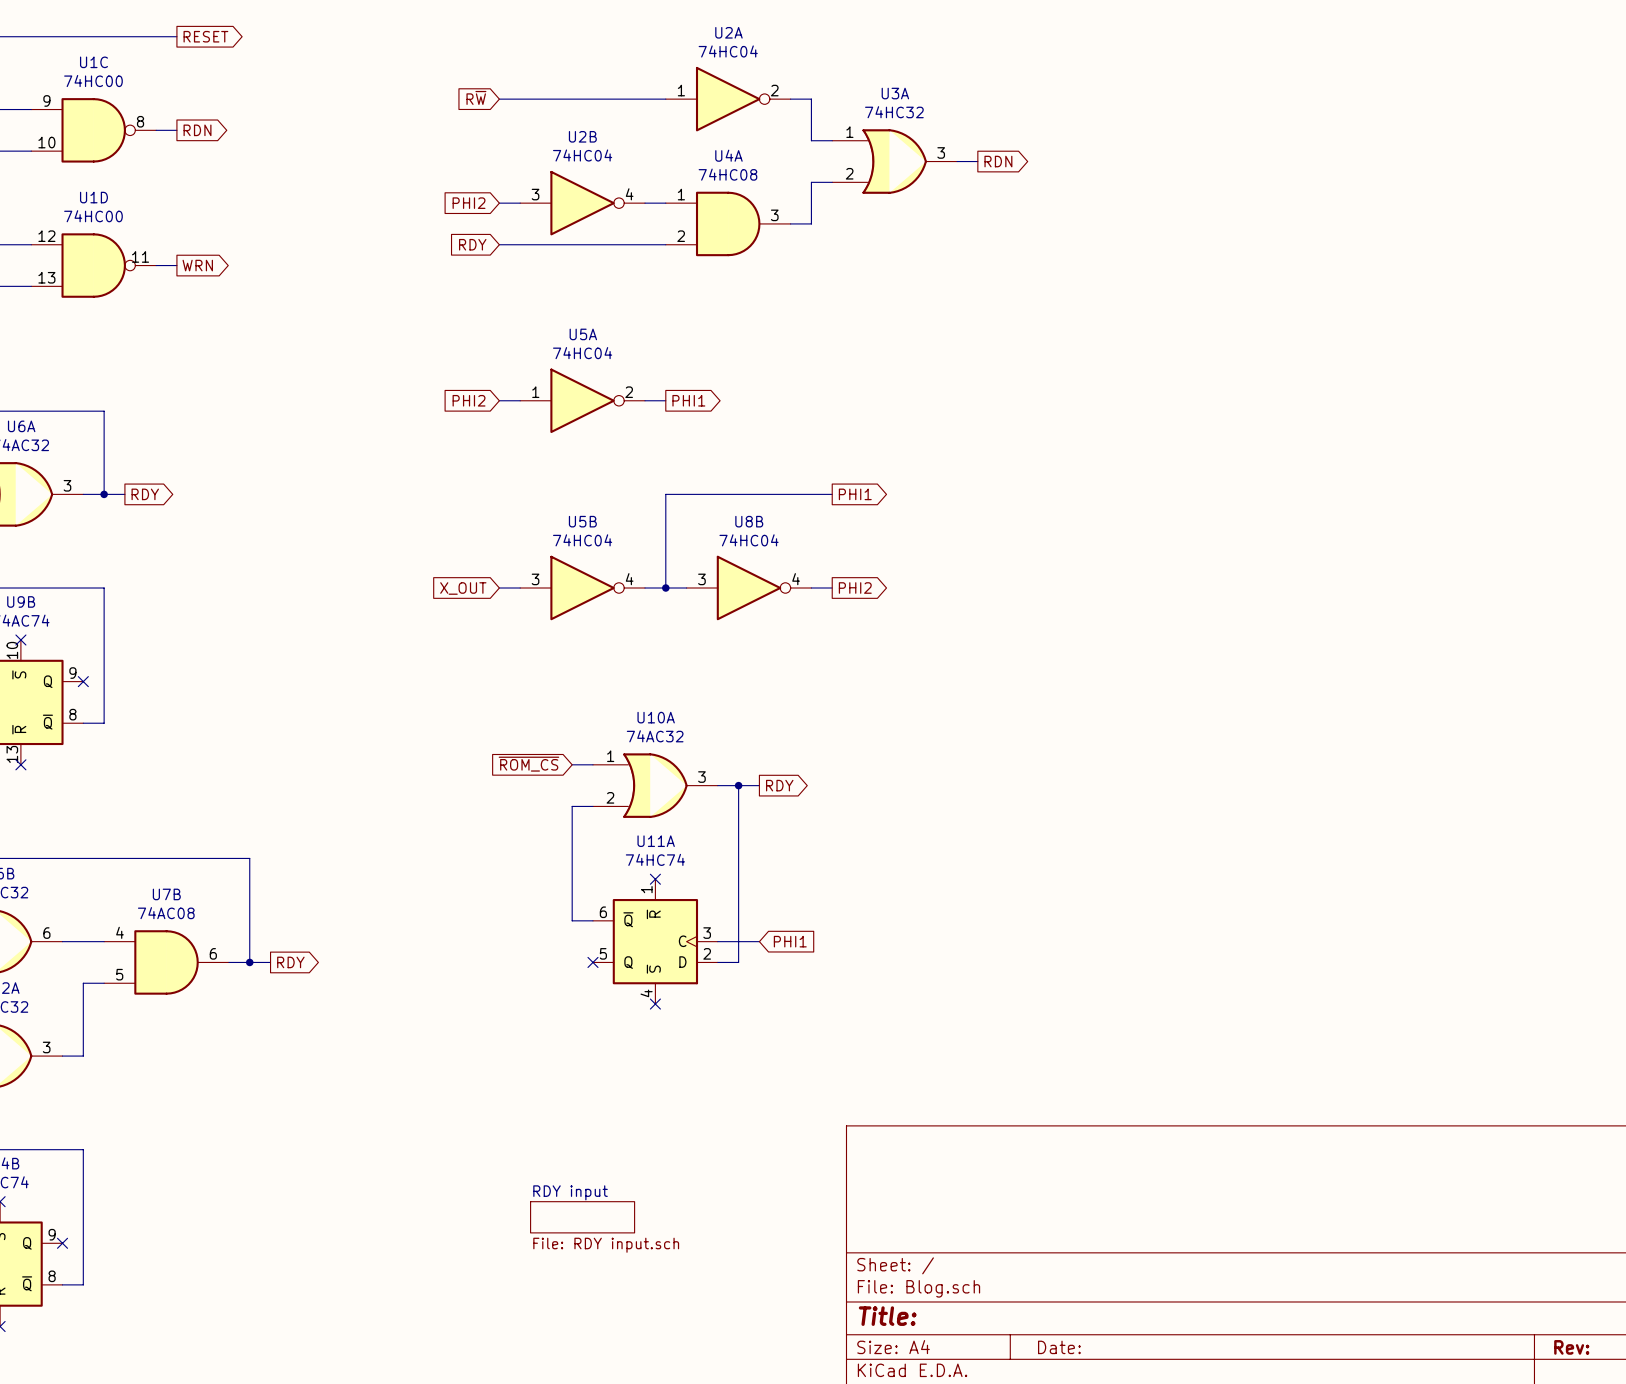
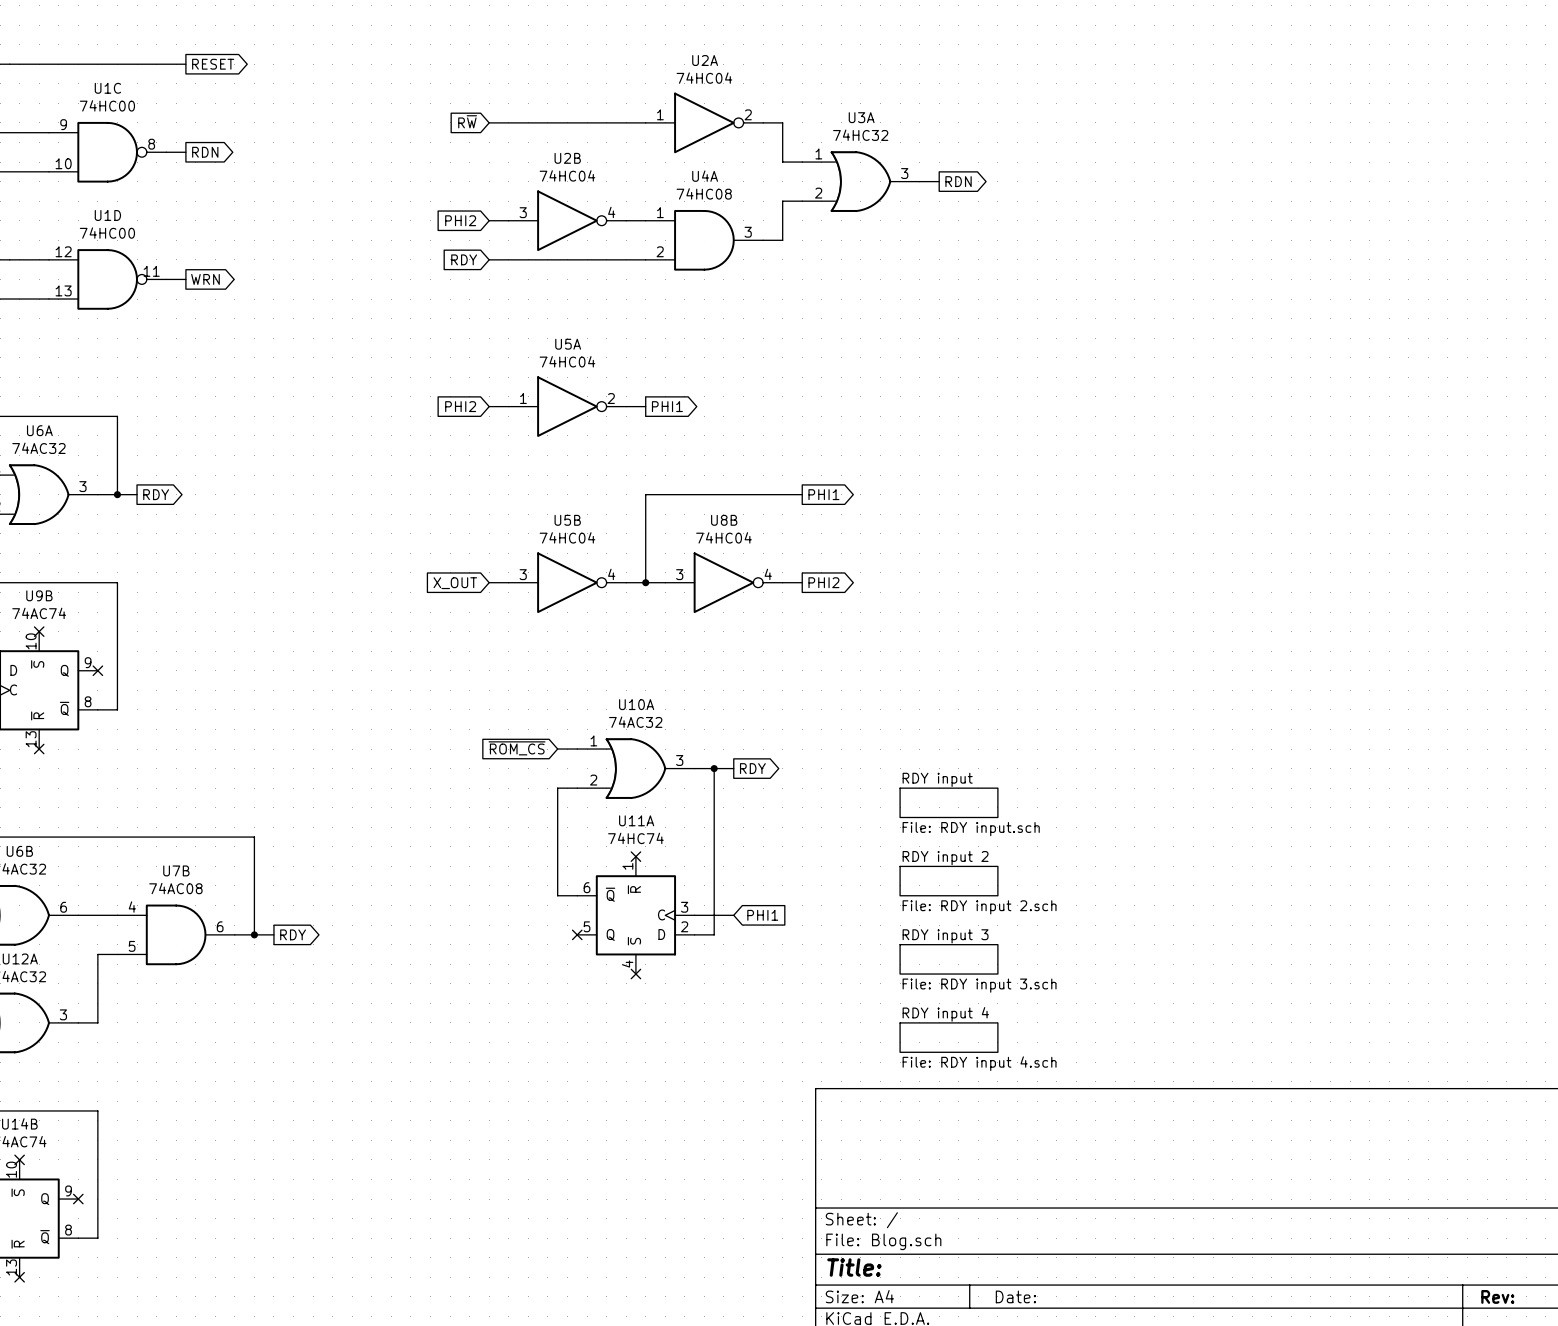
sheet RDY input: none -> File: RDY input.sch (948, 802)
sheet RDY input 2: none -> File: RDY input 2.sch (948, 881)
sheet RDY input 3: none -> File: RDY input 3.sch (948, 959)
sheet RDY input 4: none -> File: RDY input 4.sch (948, 1037)
sheet RDY input: File: RDY input.sch (582, 1217) -> none

